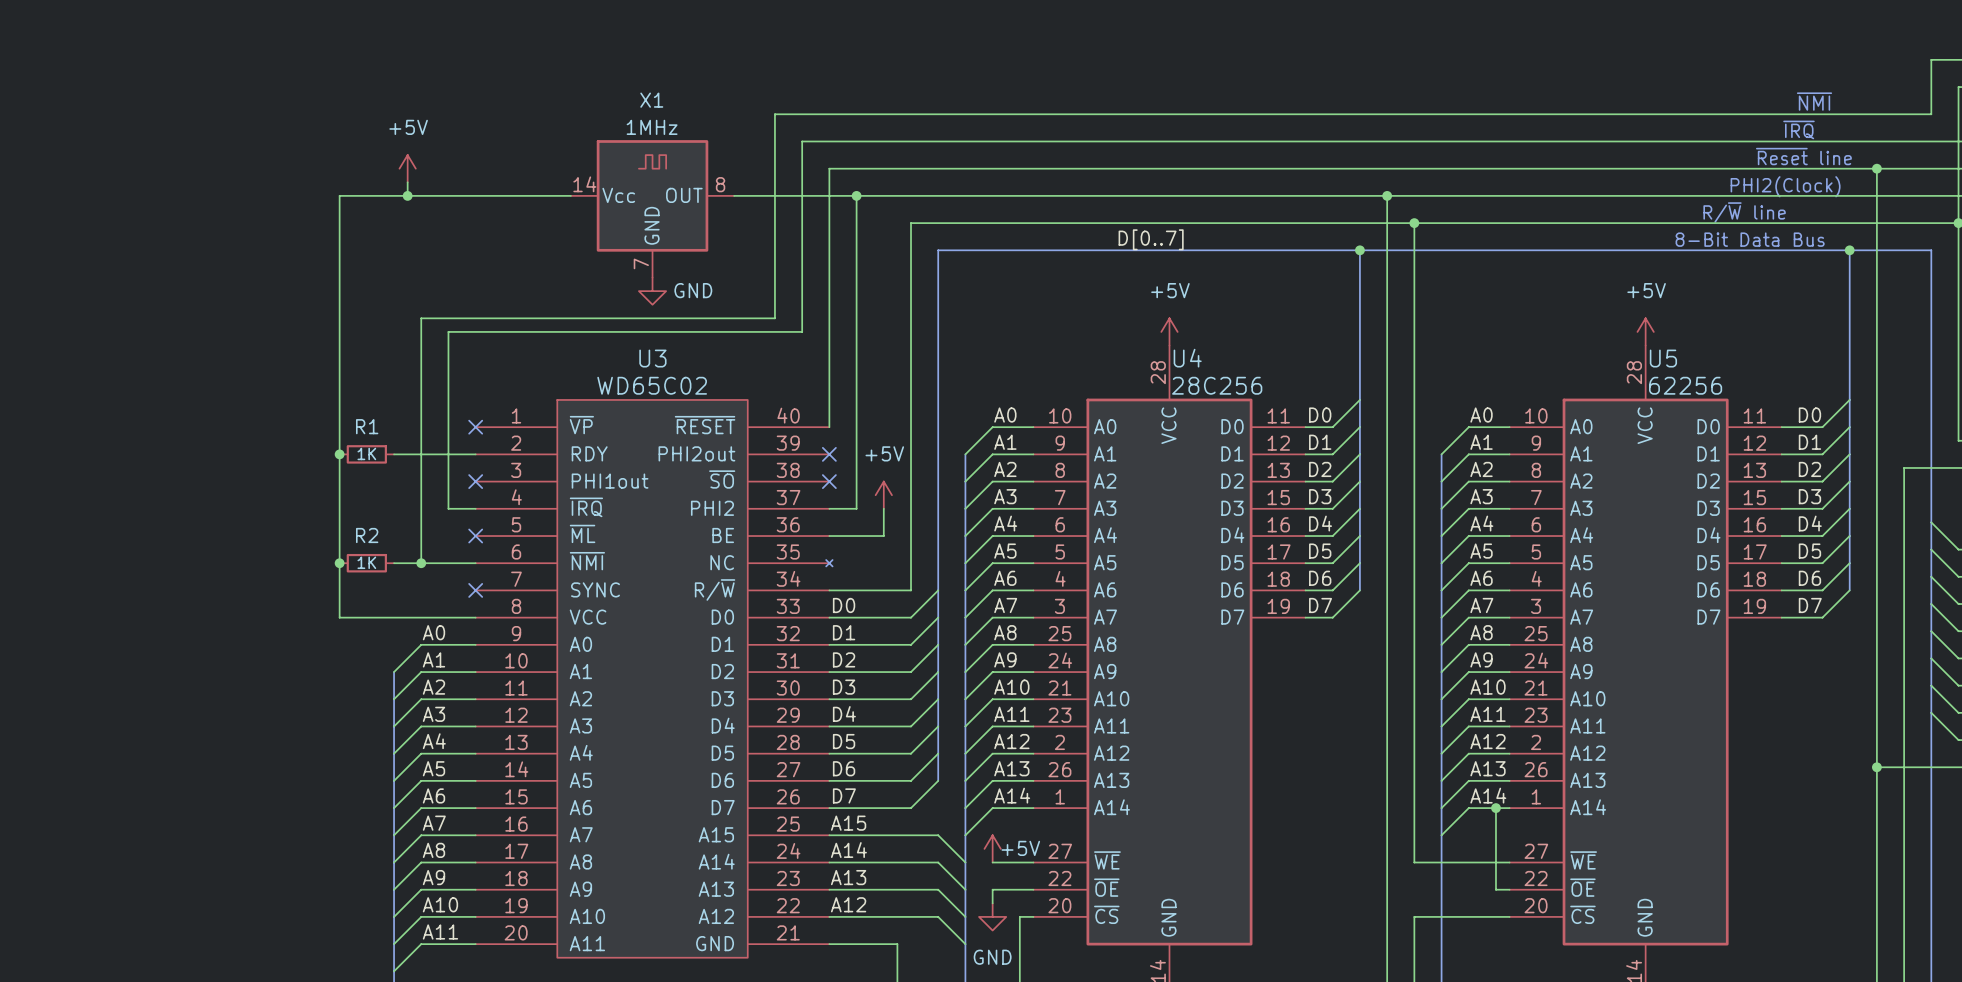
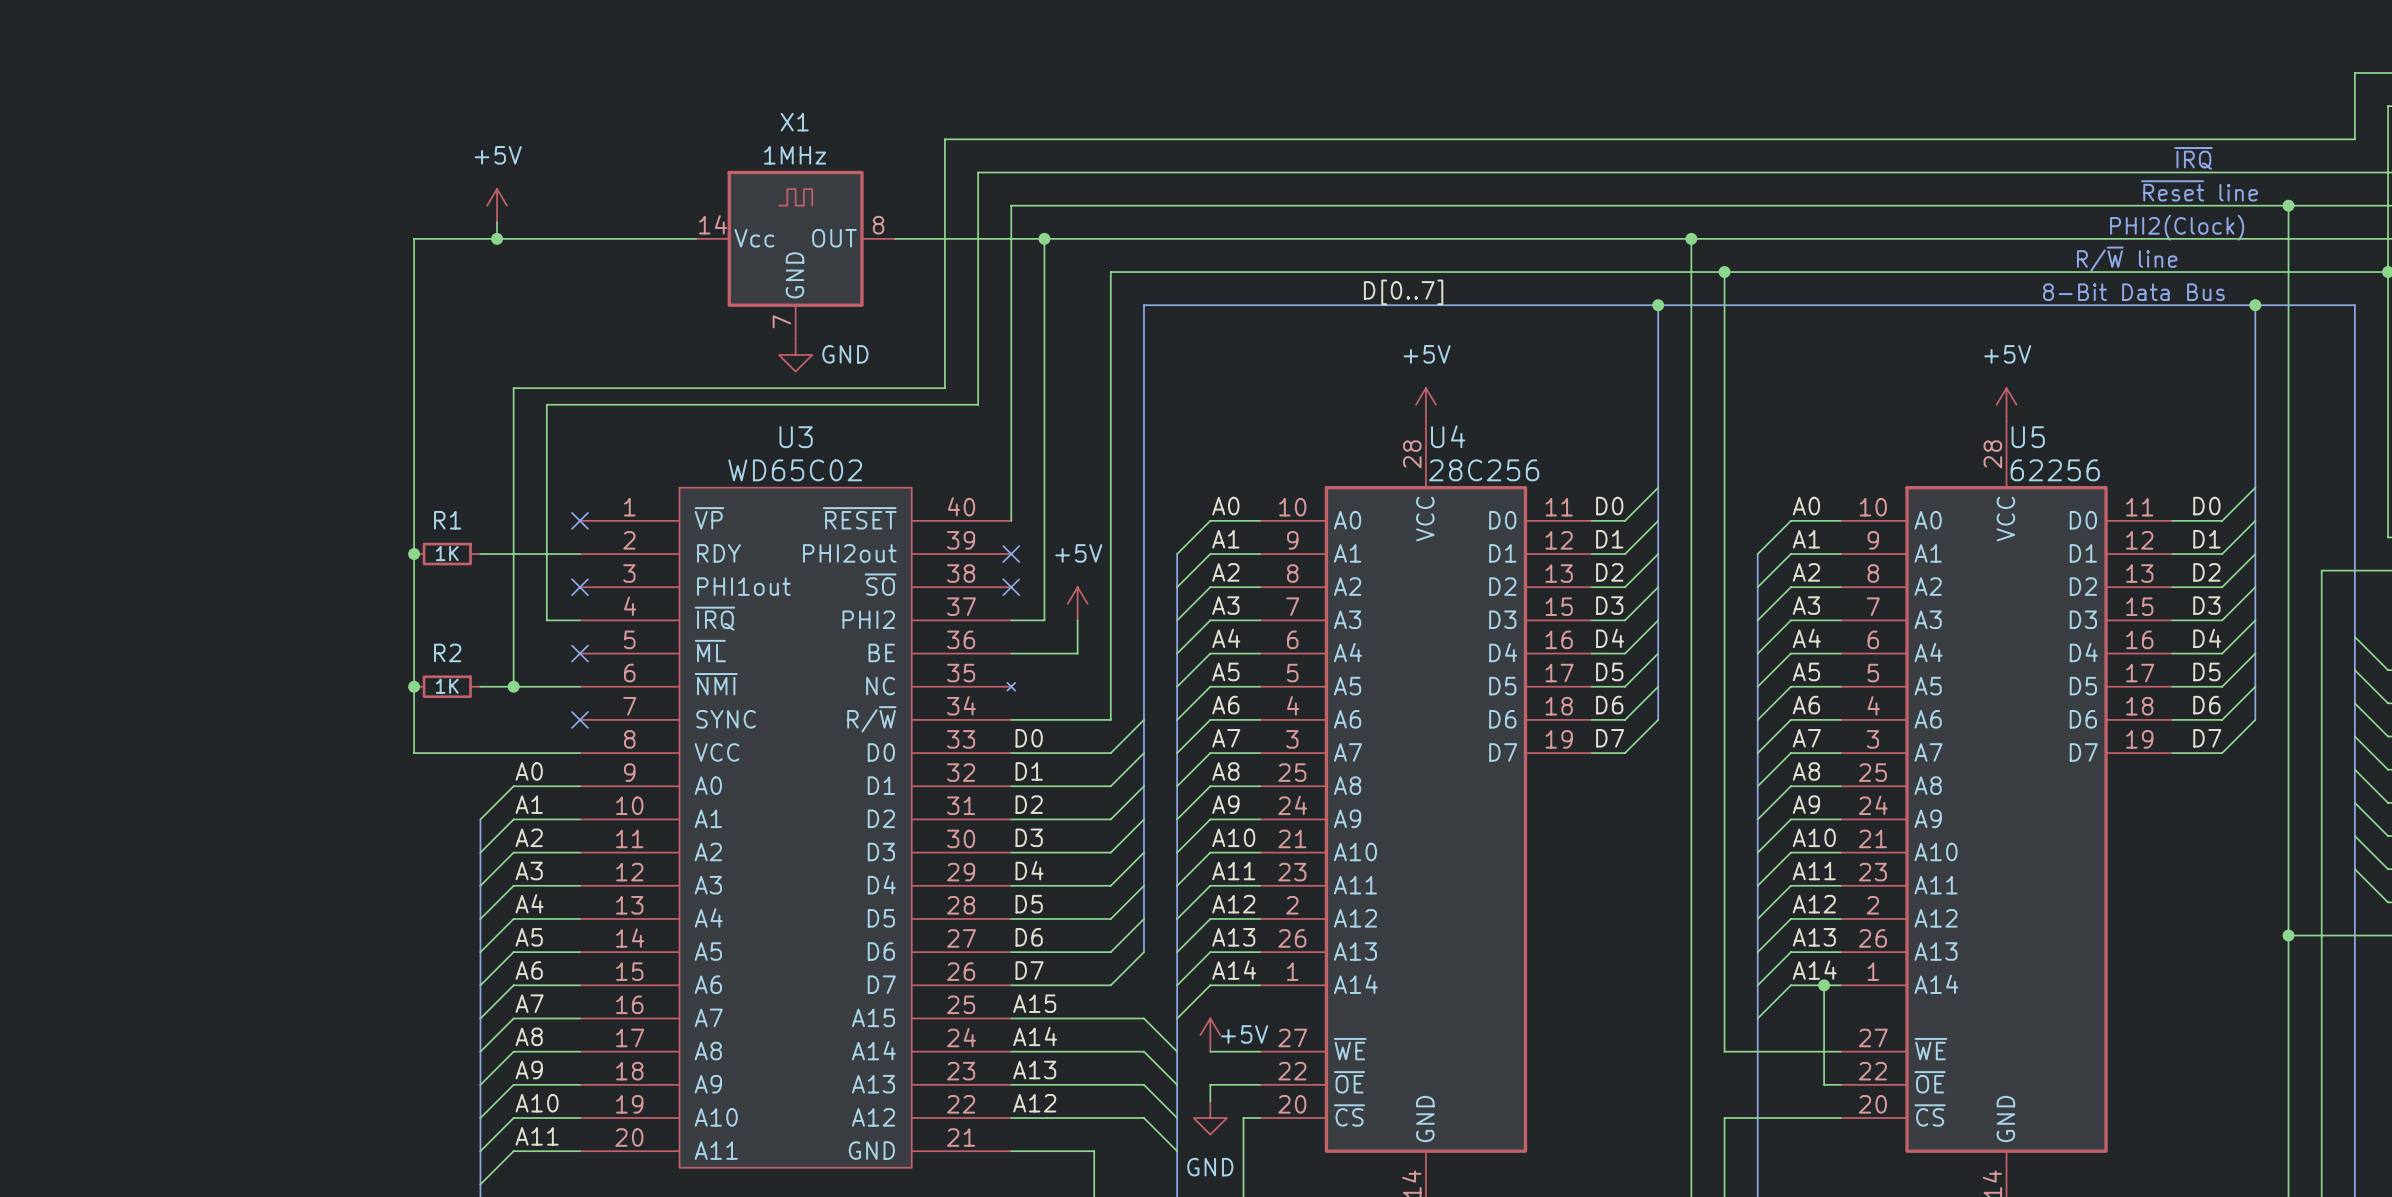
text: ~{NMI} (1814, 101) -> none

